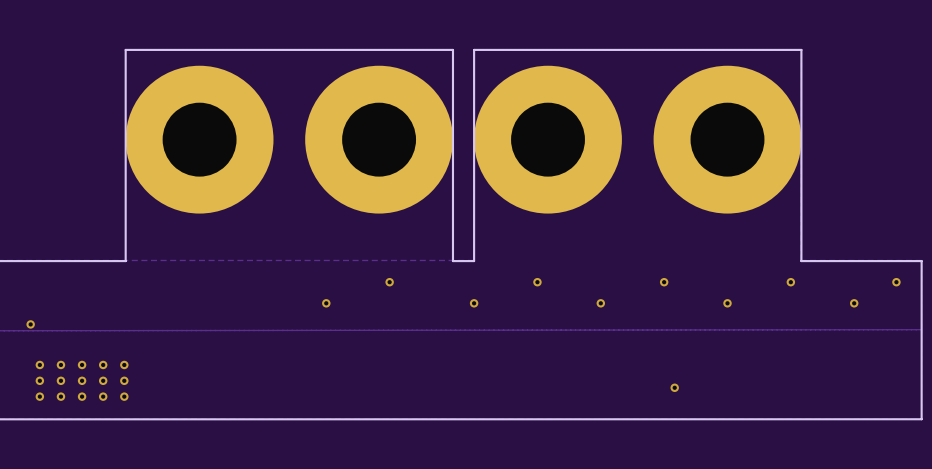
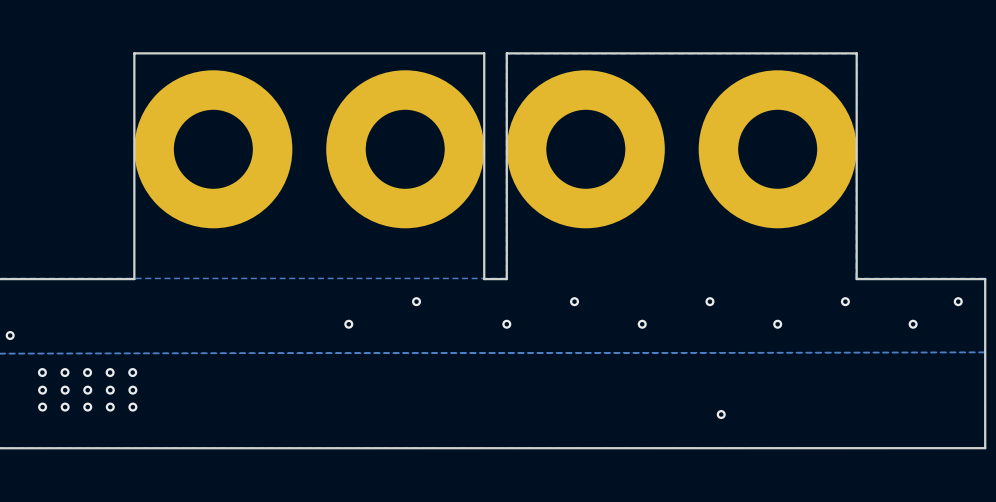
via: none -> (10, 335)
via: (30, 324) -> none
via: none -> (42, 372)
via: none -> (64, 372)
via: none -> (87, 372)
via: none -> (110, 372)
via: none -> (132, 372)
via: (39, 396) -> none
via: (60, 396) -> none
via: (82, 396) -> none
via: (103, 396) -> none
via: (124, 396) -> none

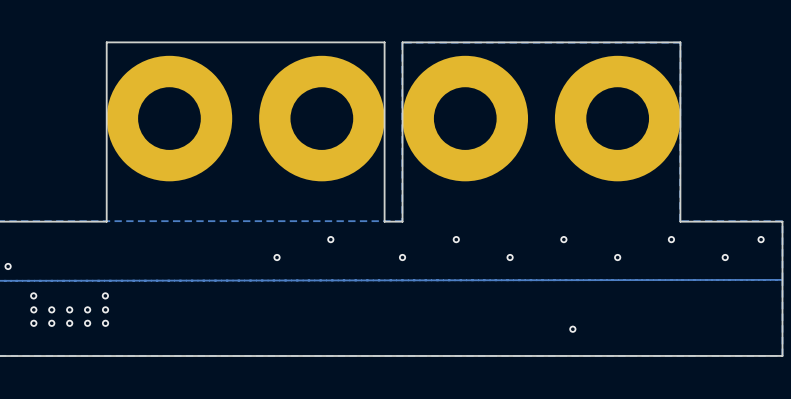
via: (64, 372) -> none
via: (87, 372) -> none
via: (110, 372) -> none

